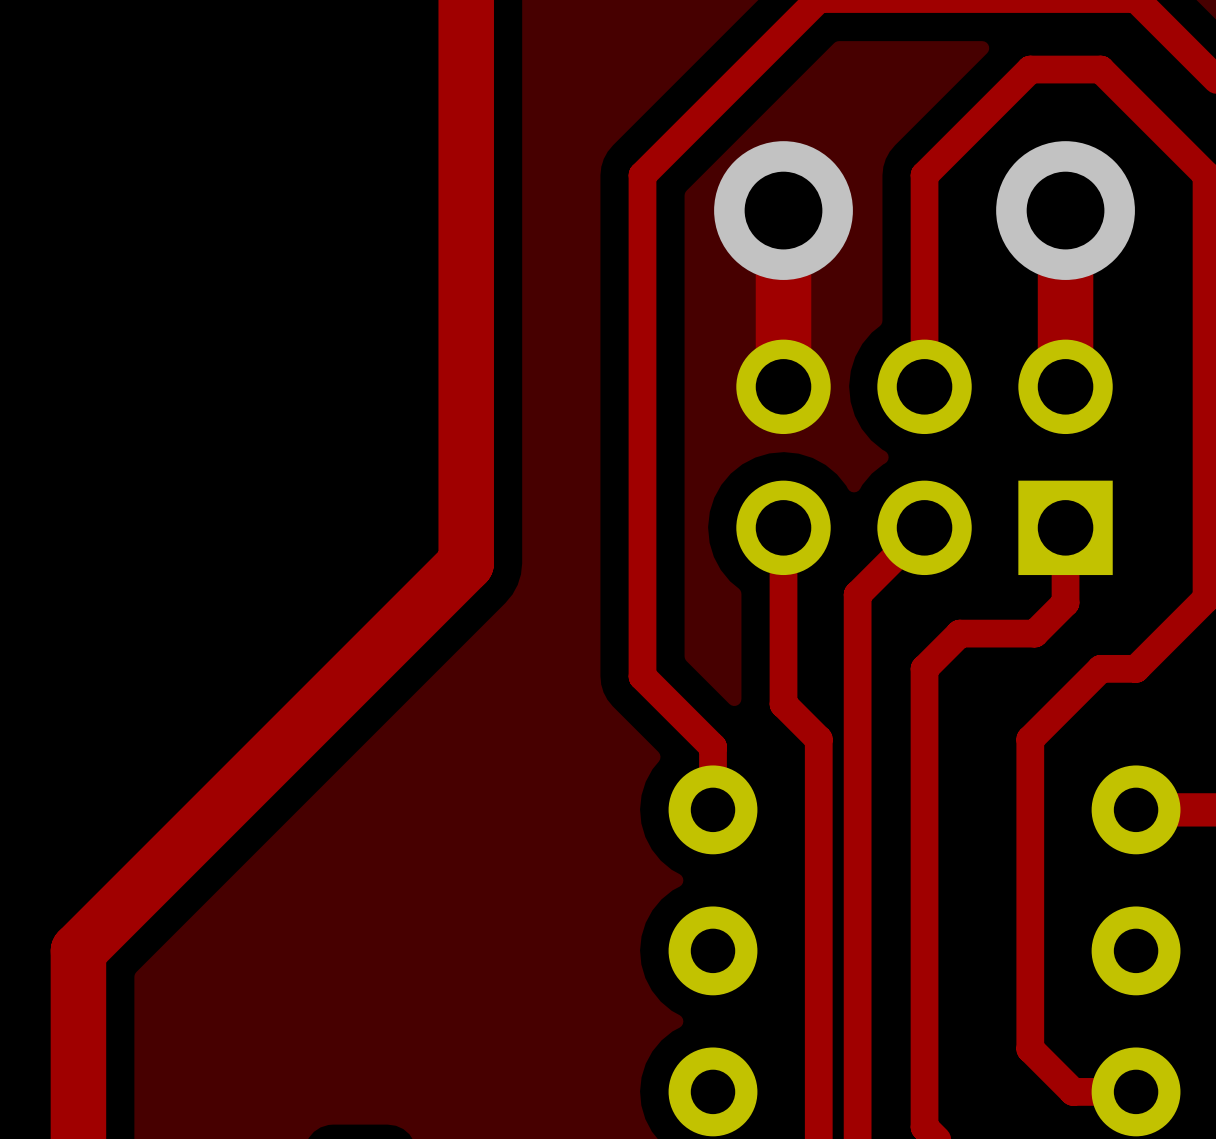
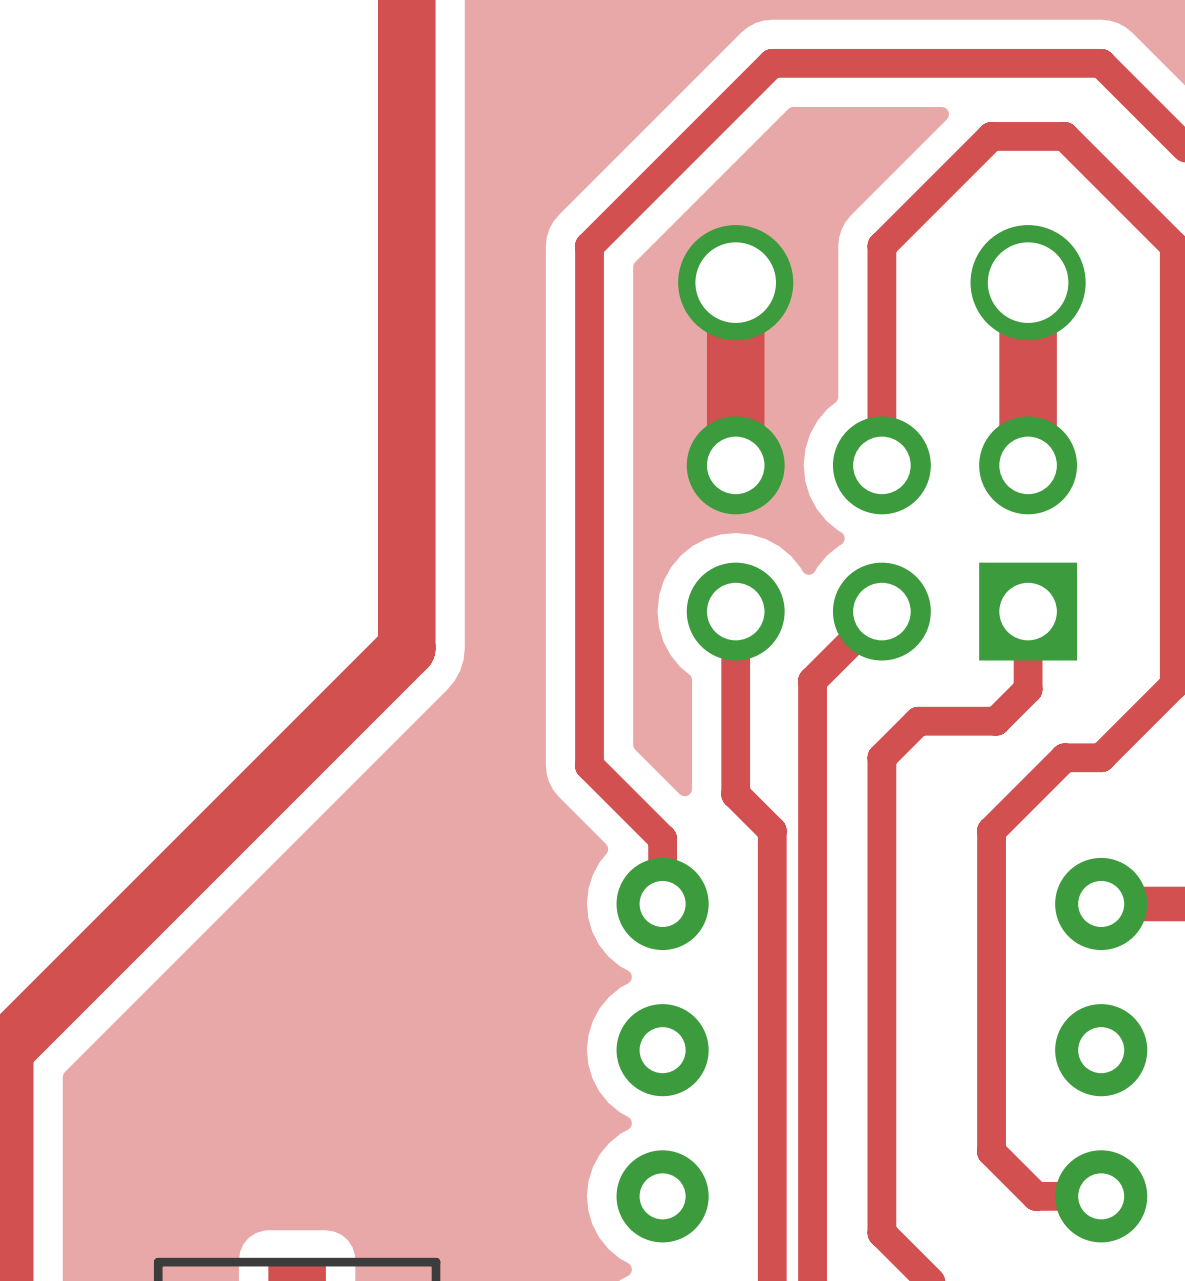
via size: [714, 141, 853, 280] -> [678, 225, 794, 341]
via size: [996, 141, 1135, 280] -> [970, 225, 1086, 341]

